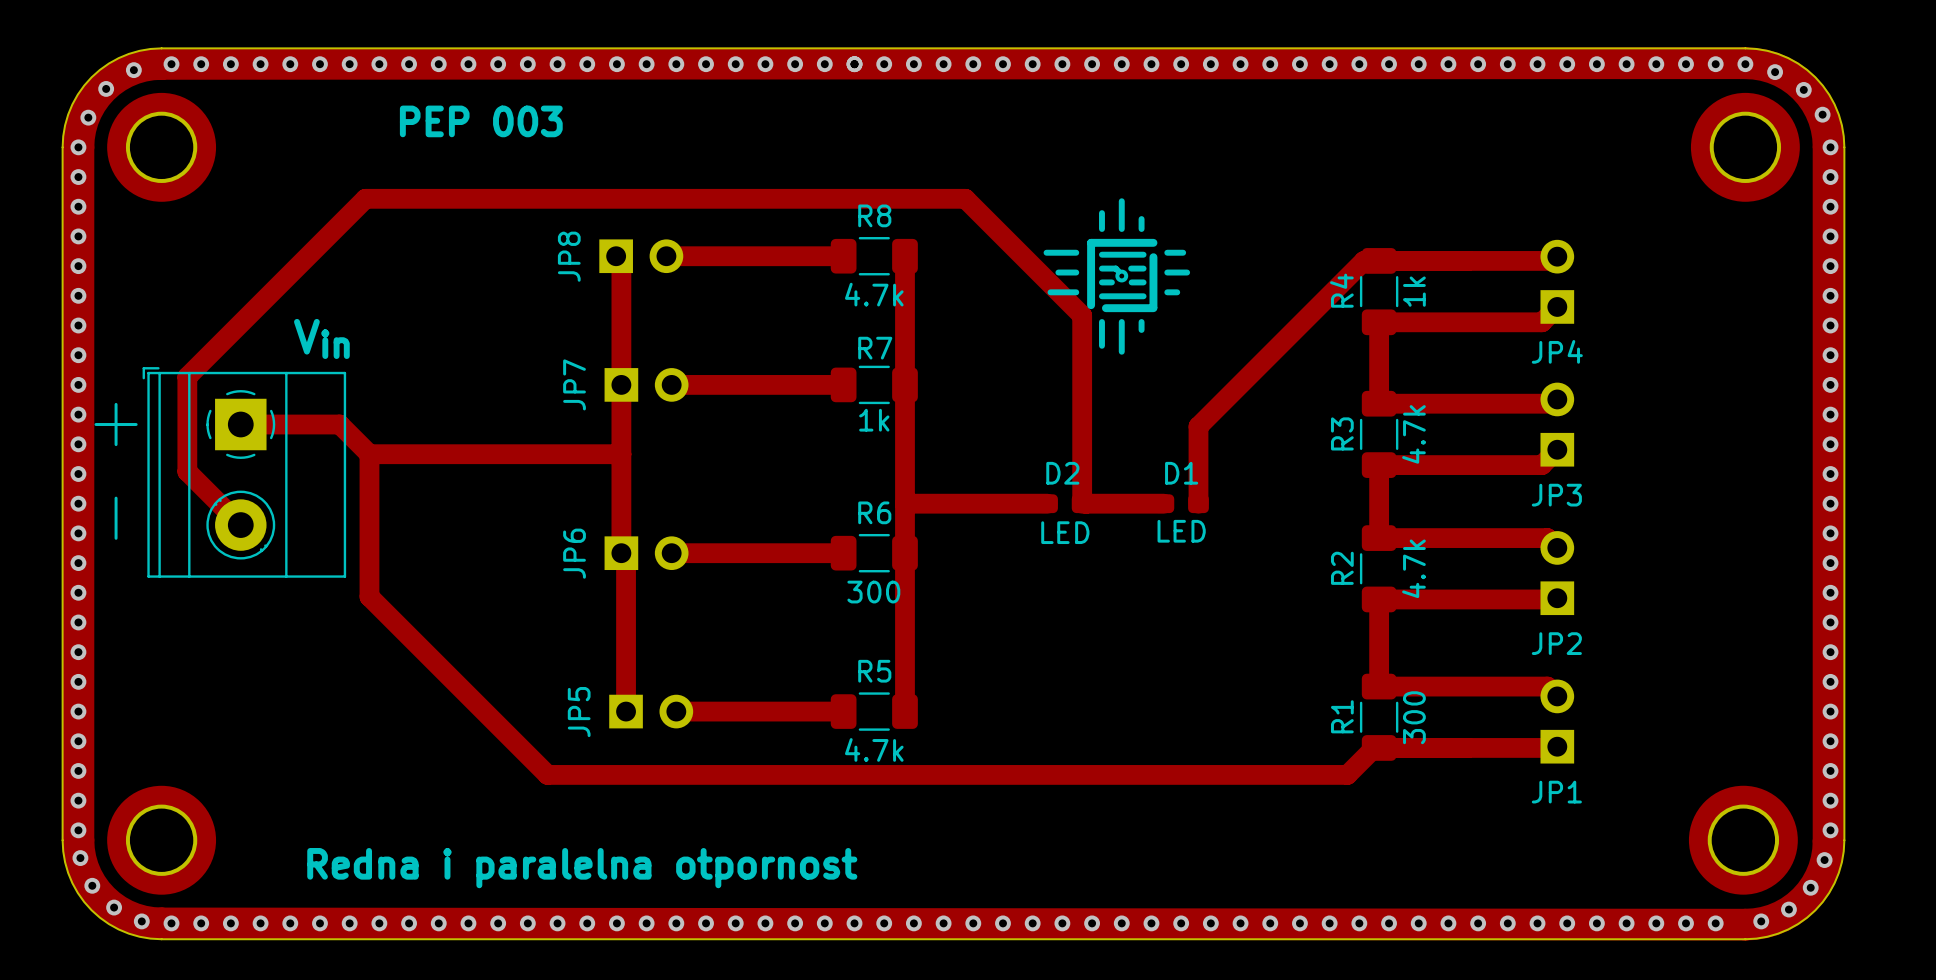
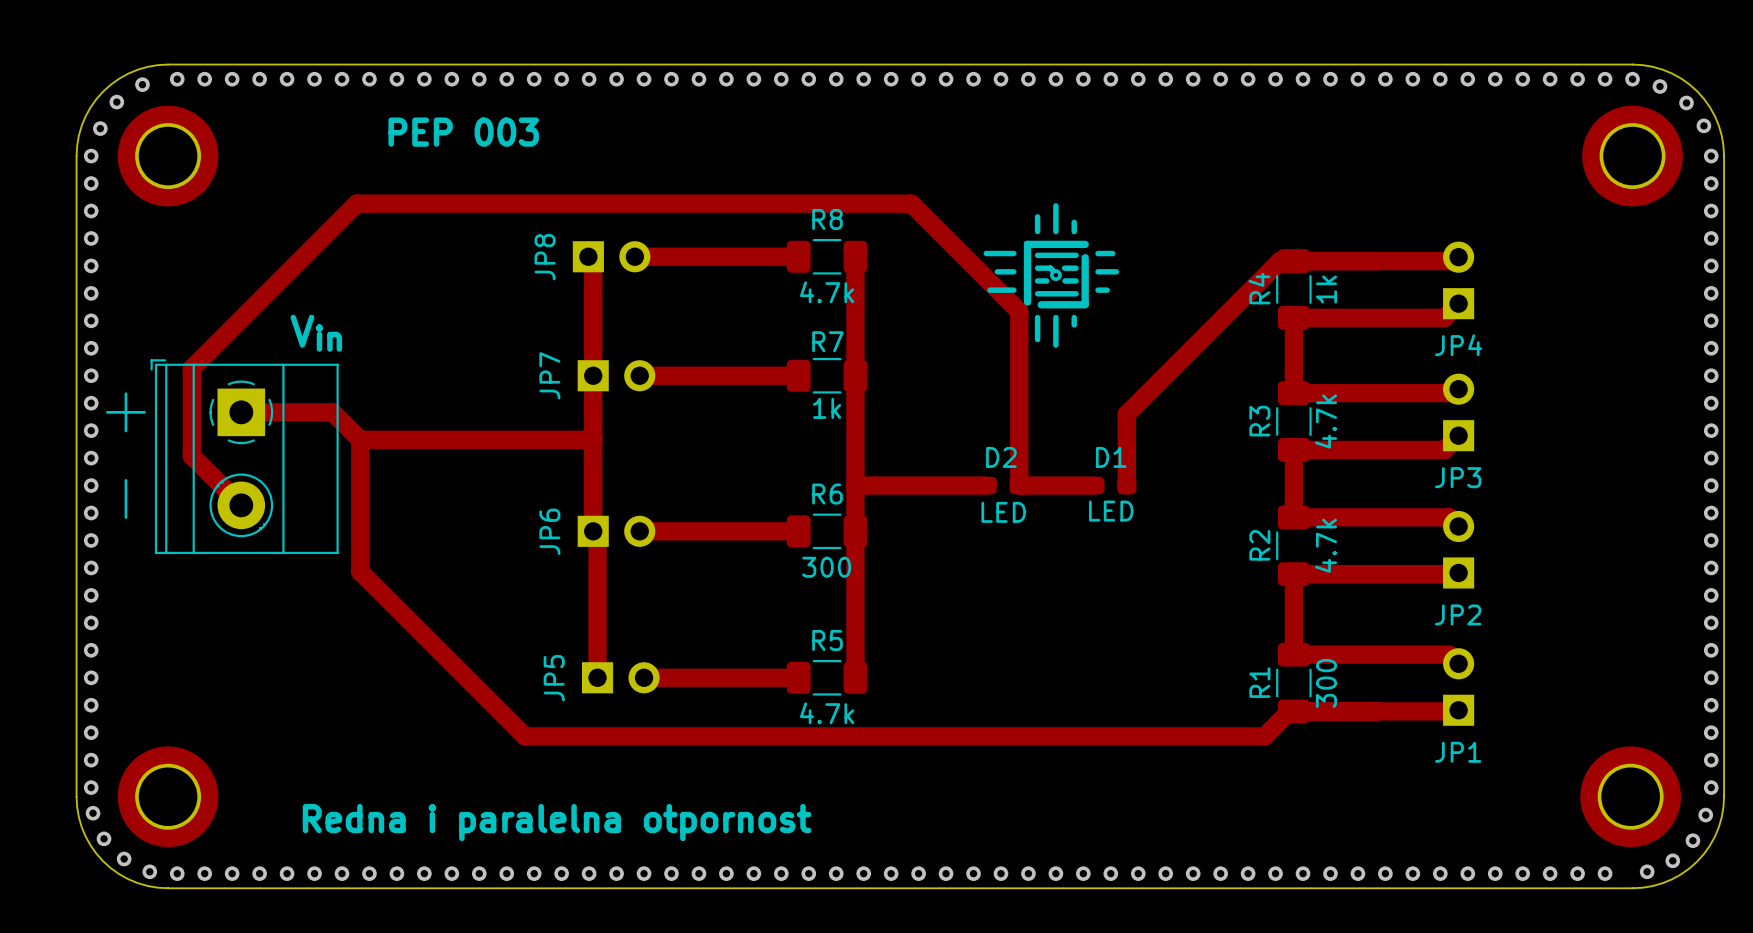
track: (1828, 146) (1823, 118) (1815, 102) (1804, 87) (1789, 75) (1772, 67) (1745, 63) (161, 63) (143, 66) (125, 72) (102, 88) (91, 102) (80, 128) (78, 147) (78, 840) (80, 858) (86, 876) (96, 892) (117, 910) (134, 918) (161, 923) (1745, 924) (1763, 922) (1781, 916) (1804, 900) (1815, 885) (1823, 868) (1828, 850) (1828, 147) -> none

